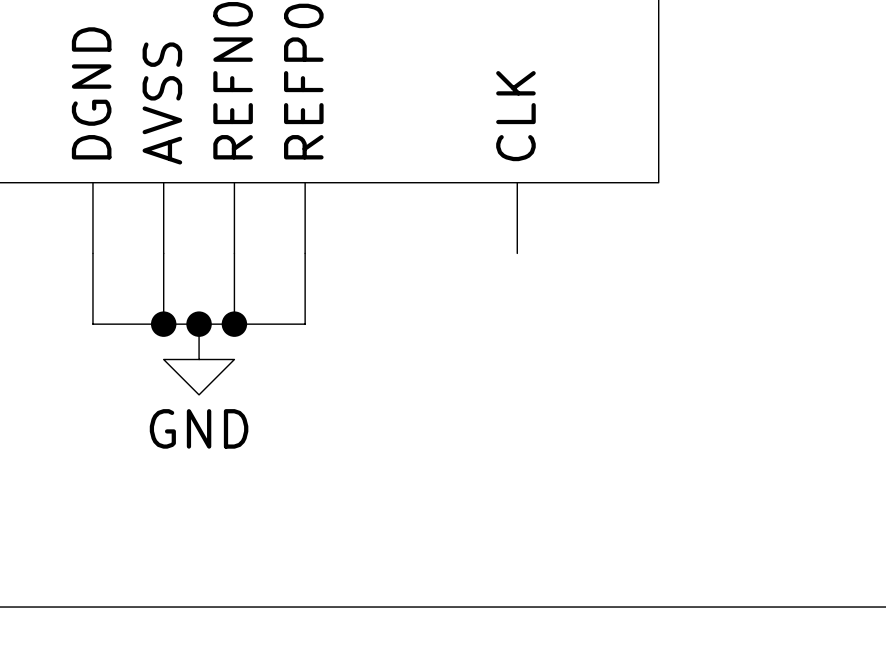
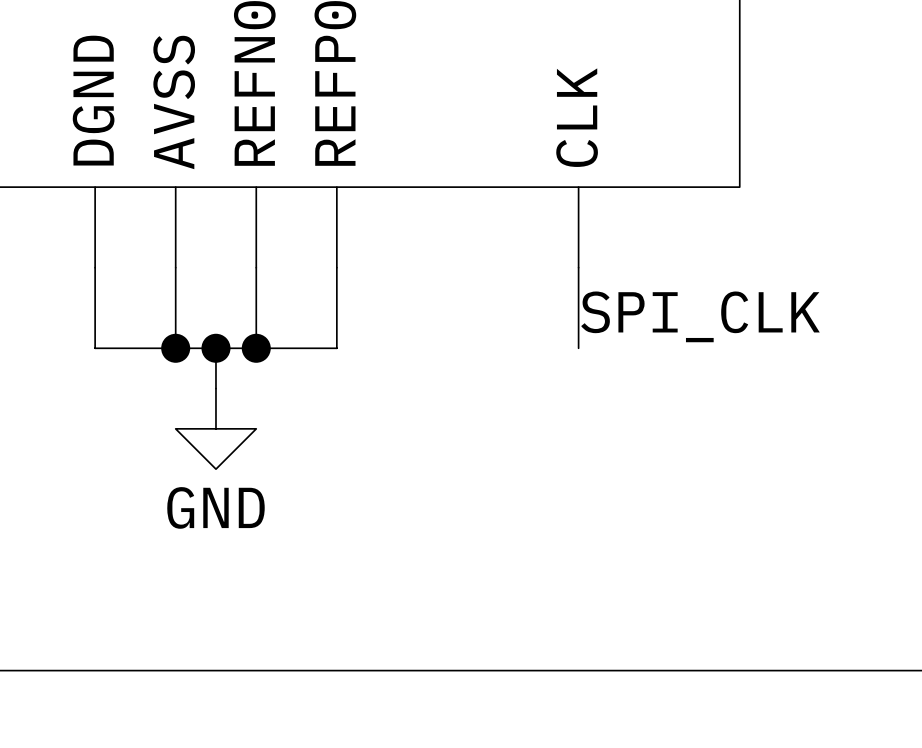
wire: none -> (578, 267) (578, 348)
label: none -> SPI_CLK (700, 316)
power symbol position: GND (199, 359) -> GND (215, 428)

